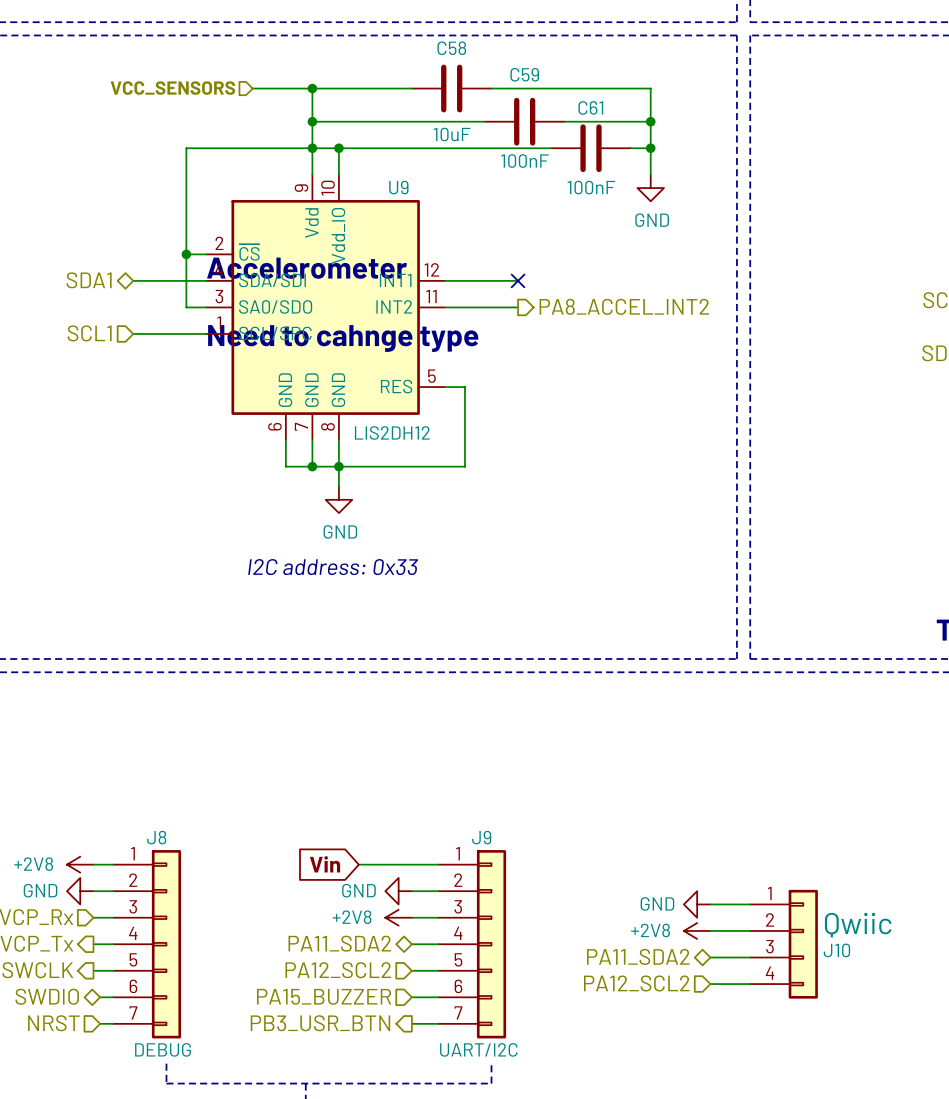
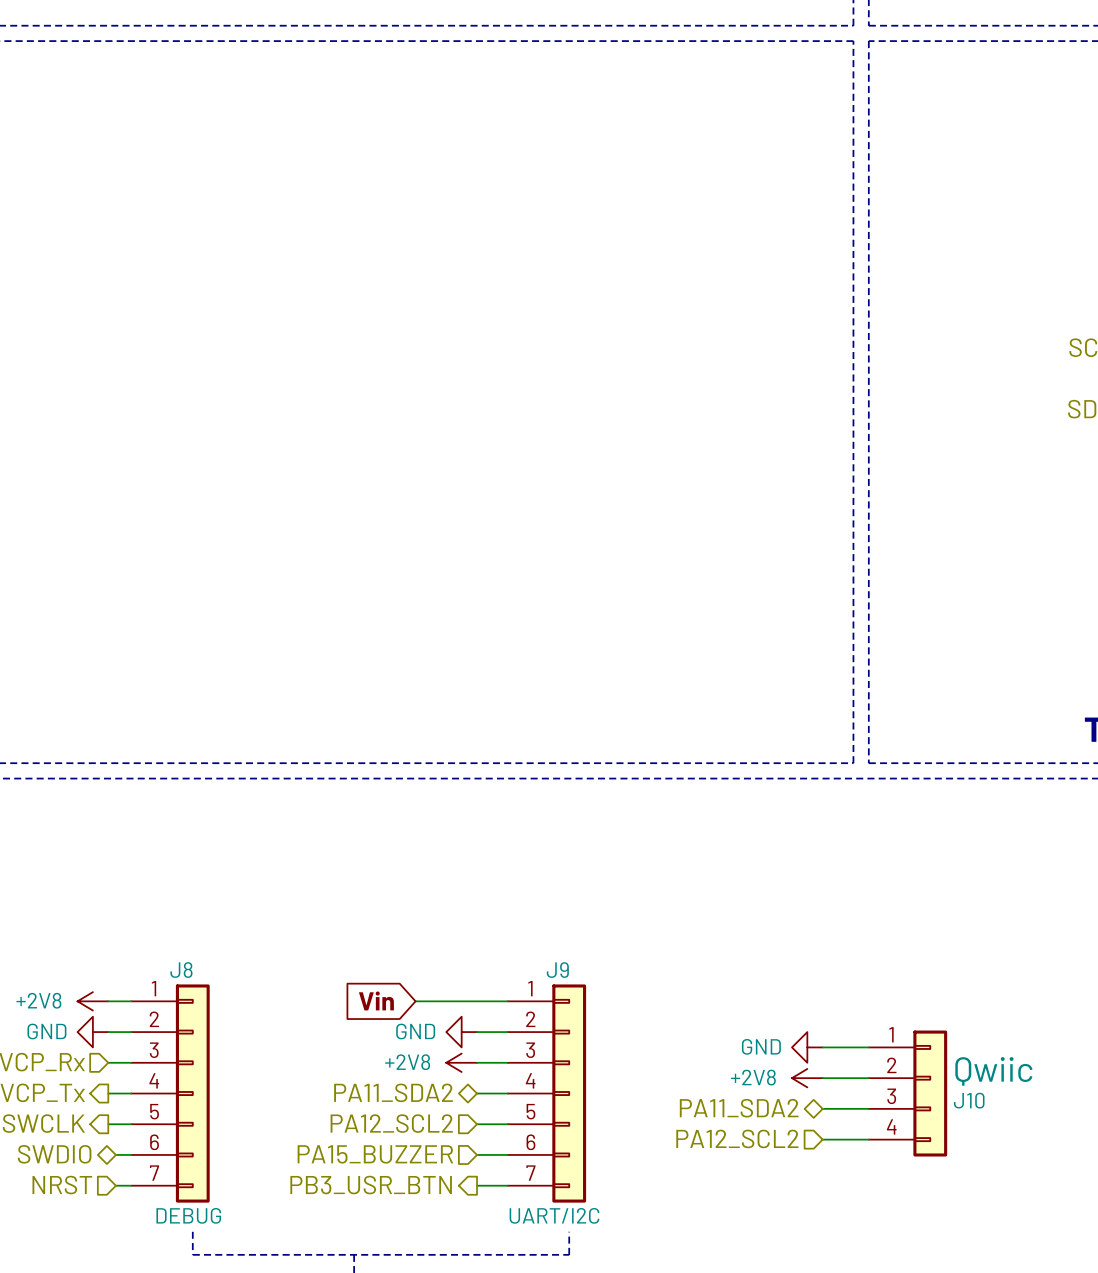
hierarchical label: VCC_SENSORS (172, 88) -> none
wire: (252, 88) (411, 88) -> none
wire: (312, 88) (312, 174) -> none
junction: (312, 88) -> none
C58: 10uF (451, 88) -> none
wire: (491, 88) (650, 88) (650, 174) -> none
wire: (312, 121) (484, 121) -> none
junction: (312, 121) -> none
C59: 100nF (524, 121) -> none
wire: (564, 121) (650, 121) -> none
junction: (650, 121) -> none
junction: (312, 148) -> none
wire: (338, 148) (338, 174) -> none
junction: (338, 148) -> none
wire: (551, 148) (186, 148) (186, 307) (206, 307) -> none
C61: 100nF (591, 148) -> none
wire: (630, 148) (650, 148) -> none
junction: (650, 148) -> none
power symbol: GND (650, 188) -> none
wire: (186, 254) (206, 254) -> none
junction: (186, 254) -> none
text: Accelerometer (306, 268) -> none
hierarchical label: SDA1 (89, 280) -> none
wire: (133, 280) (206, 280) -> none
wire: (445, 280) (518, 280) -> none
no-connect mark: (518, 280) -> none
hierarchical label: PA8_ACCEL_INT2 (624, 306) -> none
U9: LIS2DH12 (325, 307) -> none
wire: (445, 307) (518, 307) -> none
hierarchical label: SCL1 (89, 333) -> none
wire: (133, 333) (206, 333) -> none
text: Need to cahnge type (343, 338) -> none
wire: (445, 387) (464, 387) (464, 466) (285, 466) (285, 440) -> none
wire: (312, 440) (312, 466) -> none
wire: (338, 440) (338, 486) -> none
junction: (312, 466) -> none
junction: (338, 466) -> none
power symbol: GND (338, 499) -> none
text: I2C address: 0x33 (333, 567) -> none

